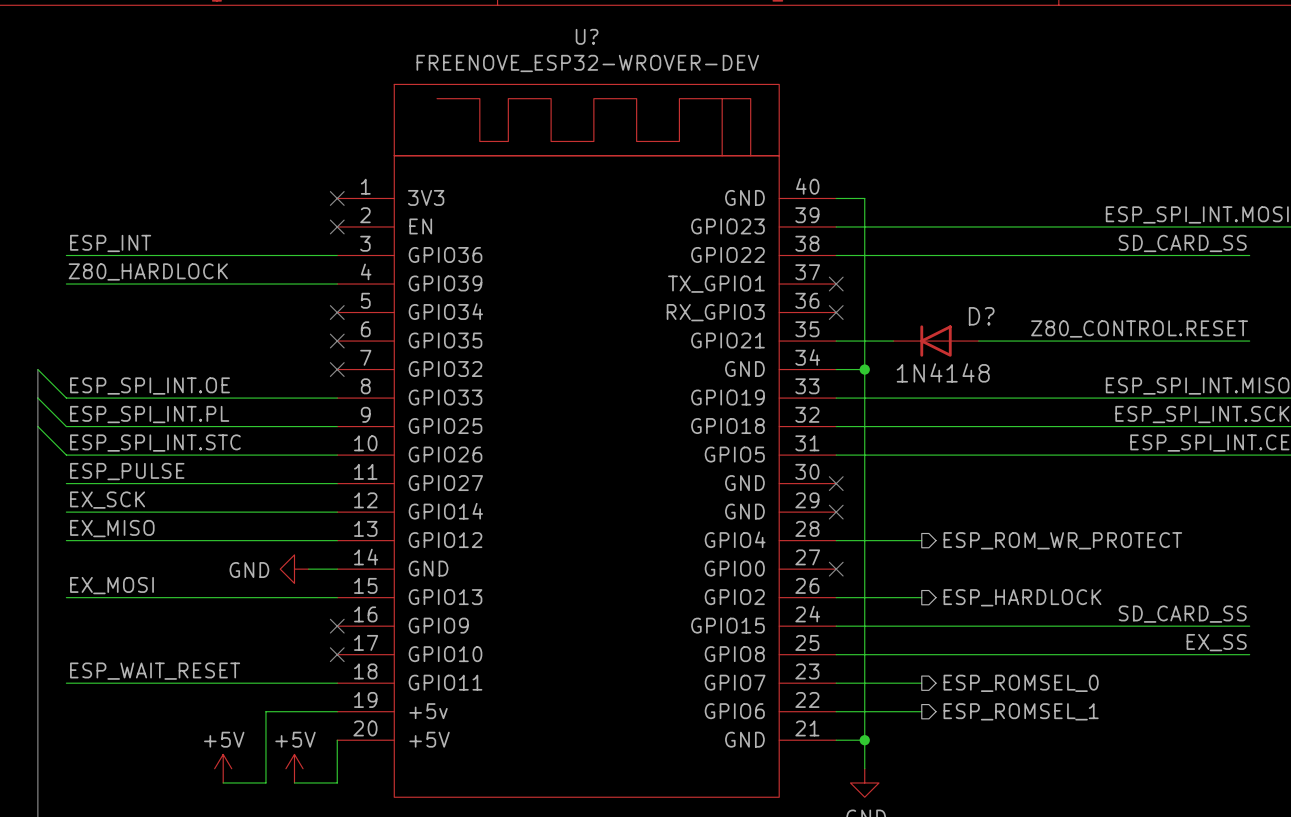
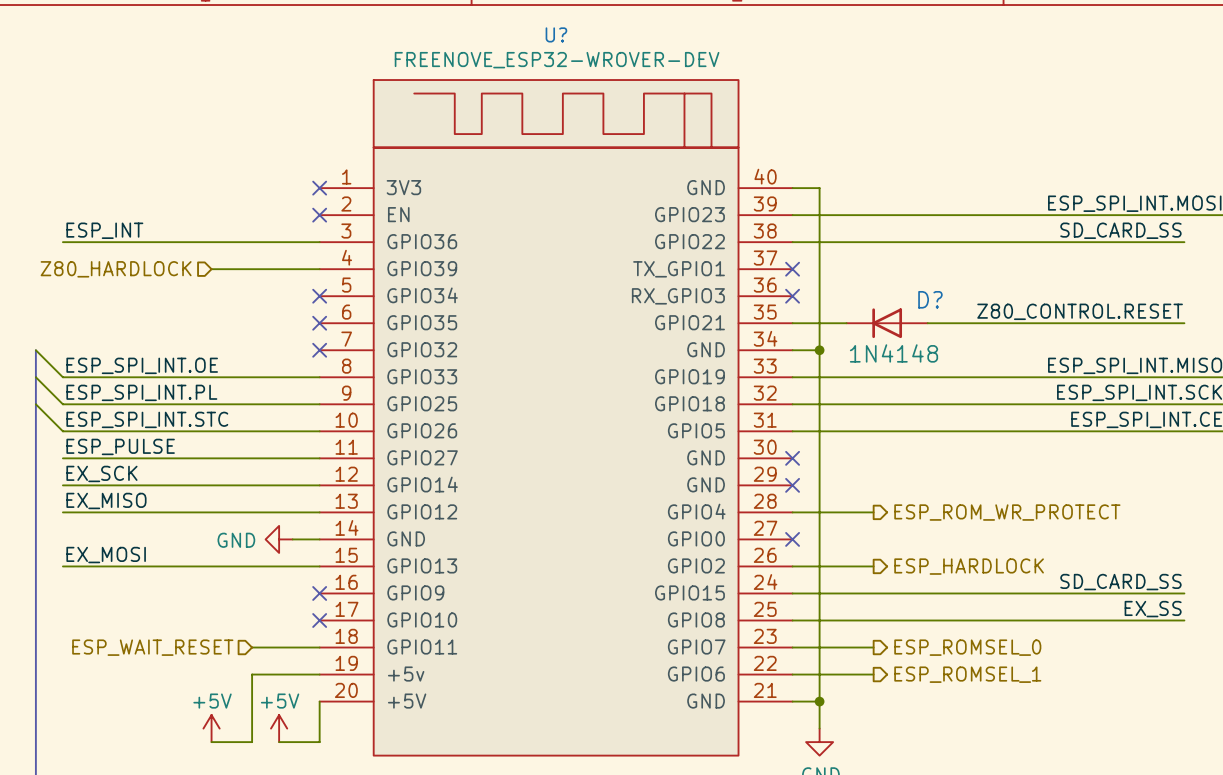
label: Z80_HARDLOCK (148, 271) -> none
wire: (66, 284) (223, 284) -> none
hierarchical label: none -> Z80_HARDLOCK (116, 269)
label: ESP_WAIT_RESET (155, 671) -> none
wire: (66, 683) (265, 683) -> none
hierarchical label: none -> ESP_WAIT_RESET (152, 647)

